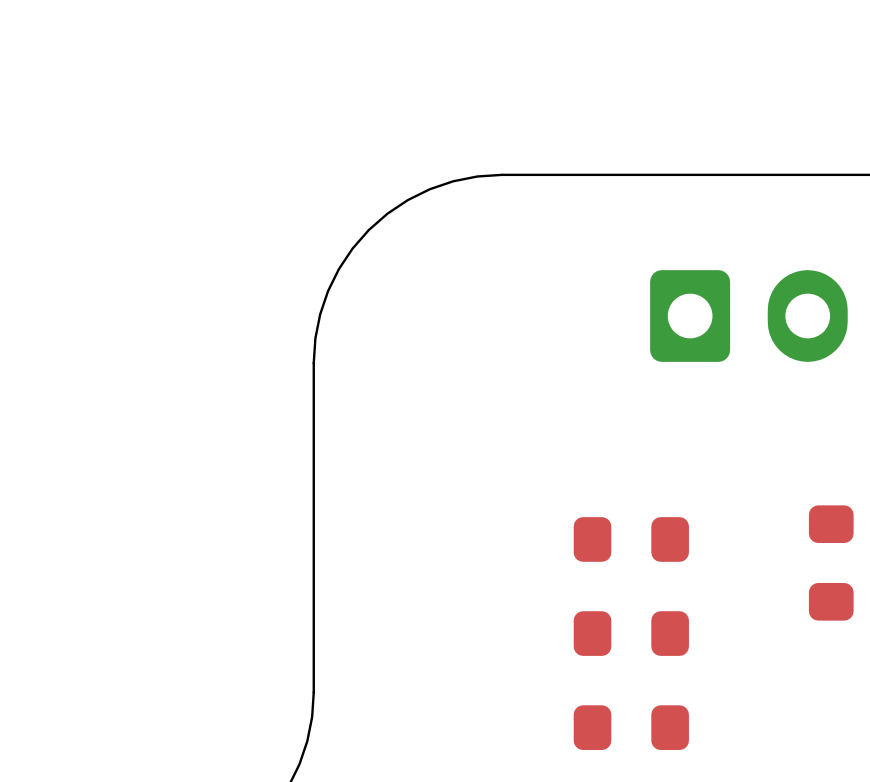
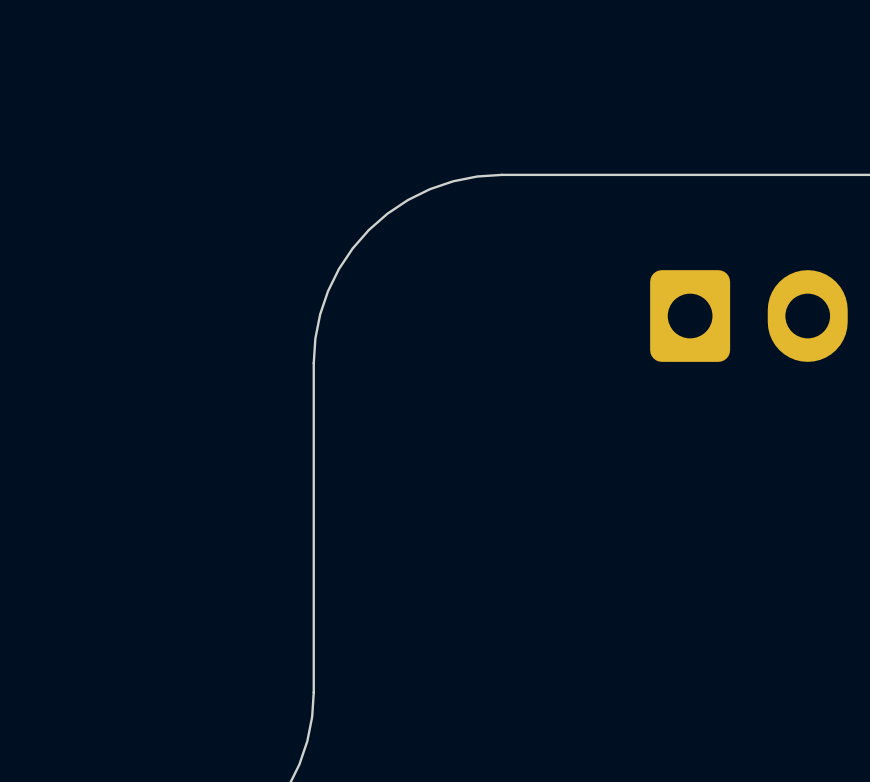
part: (631, 539) -> none
part: (831, 562) -> none
part: (631, 633) -> none
part: (631, 727) -> none

